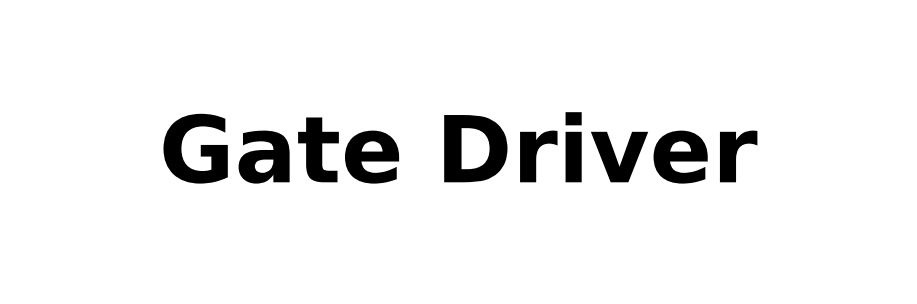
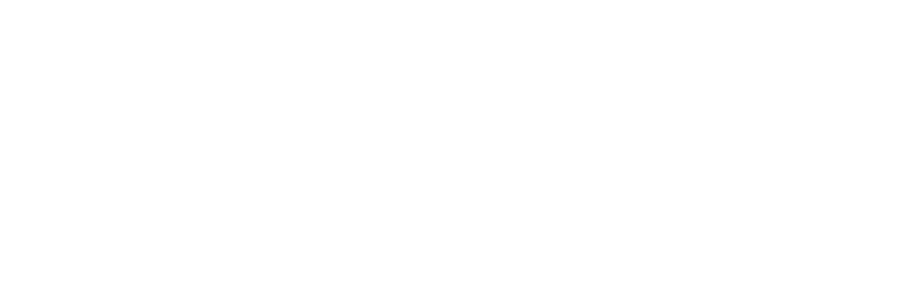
text: Gate Driver (460, 147) -> none

